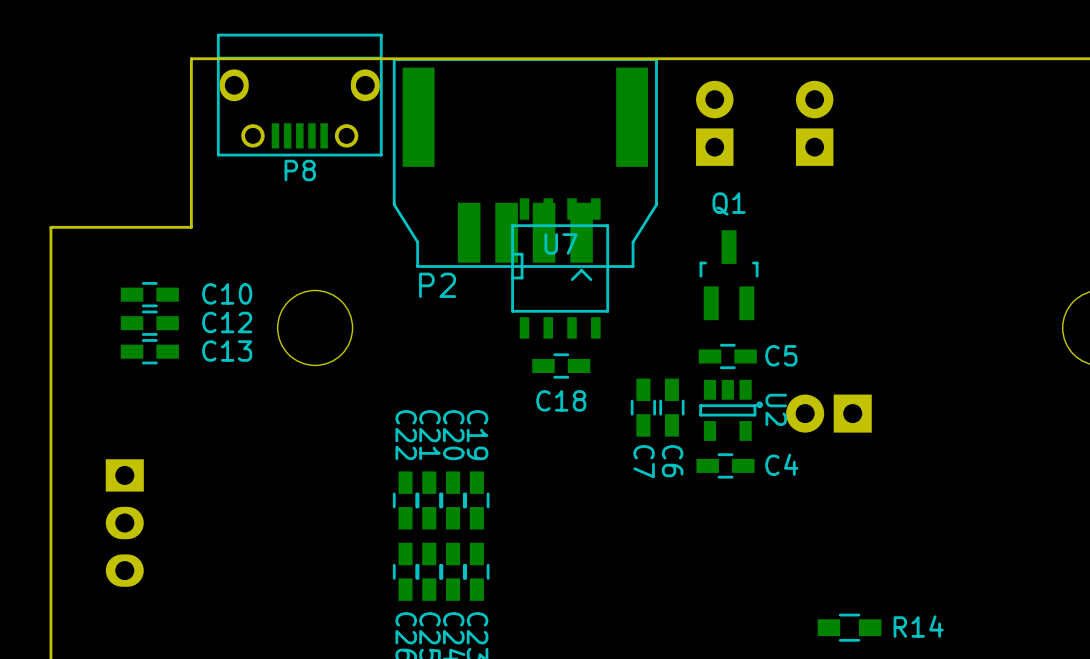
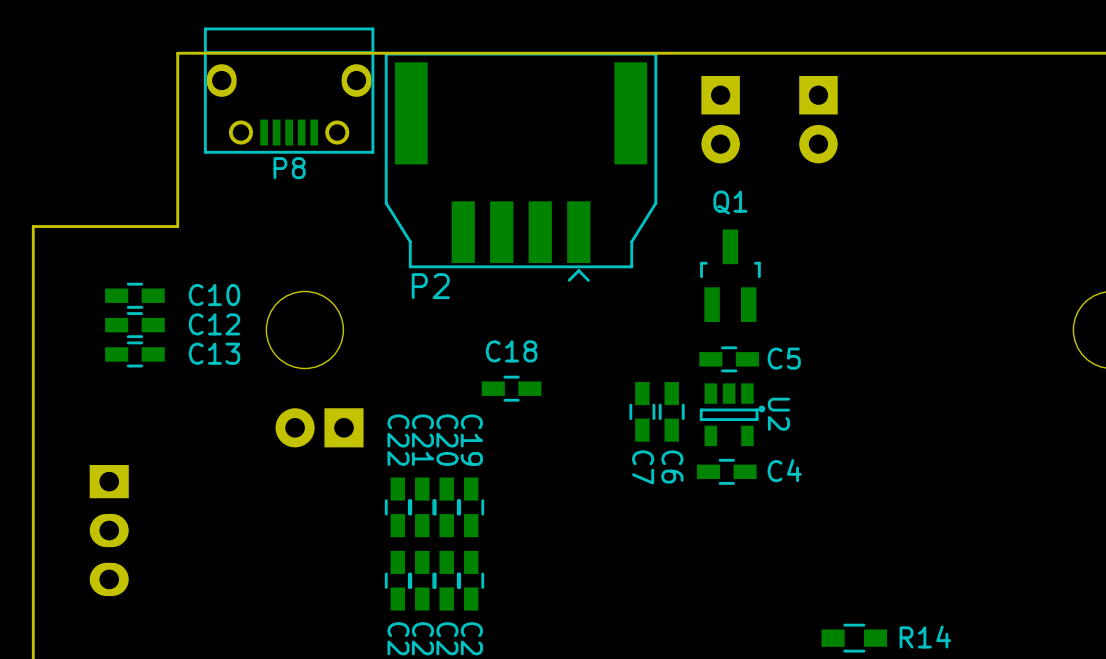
part rotation: 0° (714, 123) -> 180° (720, 119)
part rotation: 0° (814, 123) -> 180° (818, 119)
U7: (560, 268) -> none
C18 position: (561, 366) -> (511, 388)
C18 name position: C18 (561, 400) -> C18 (511, 351)
part: (828, 413) -> none
part: none -> (319, 427)

